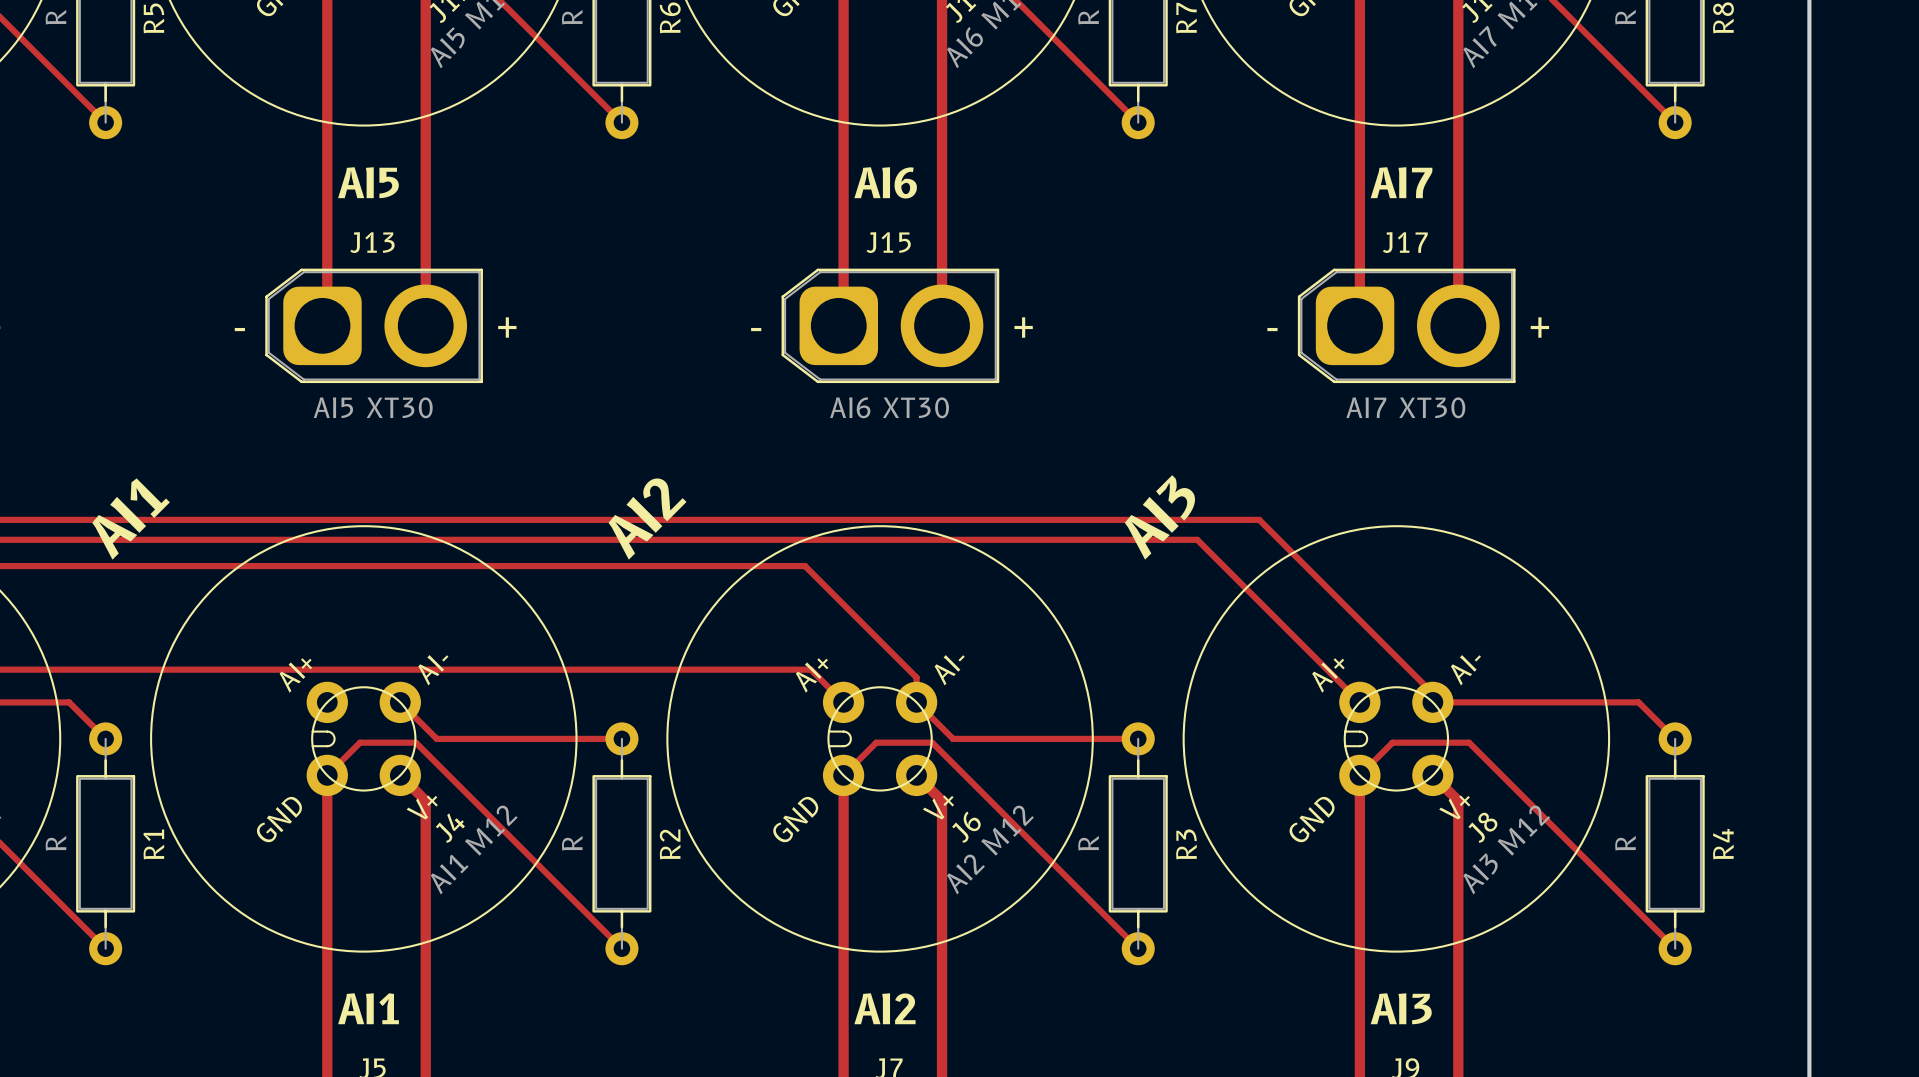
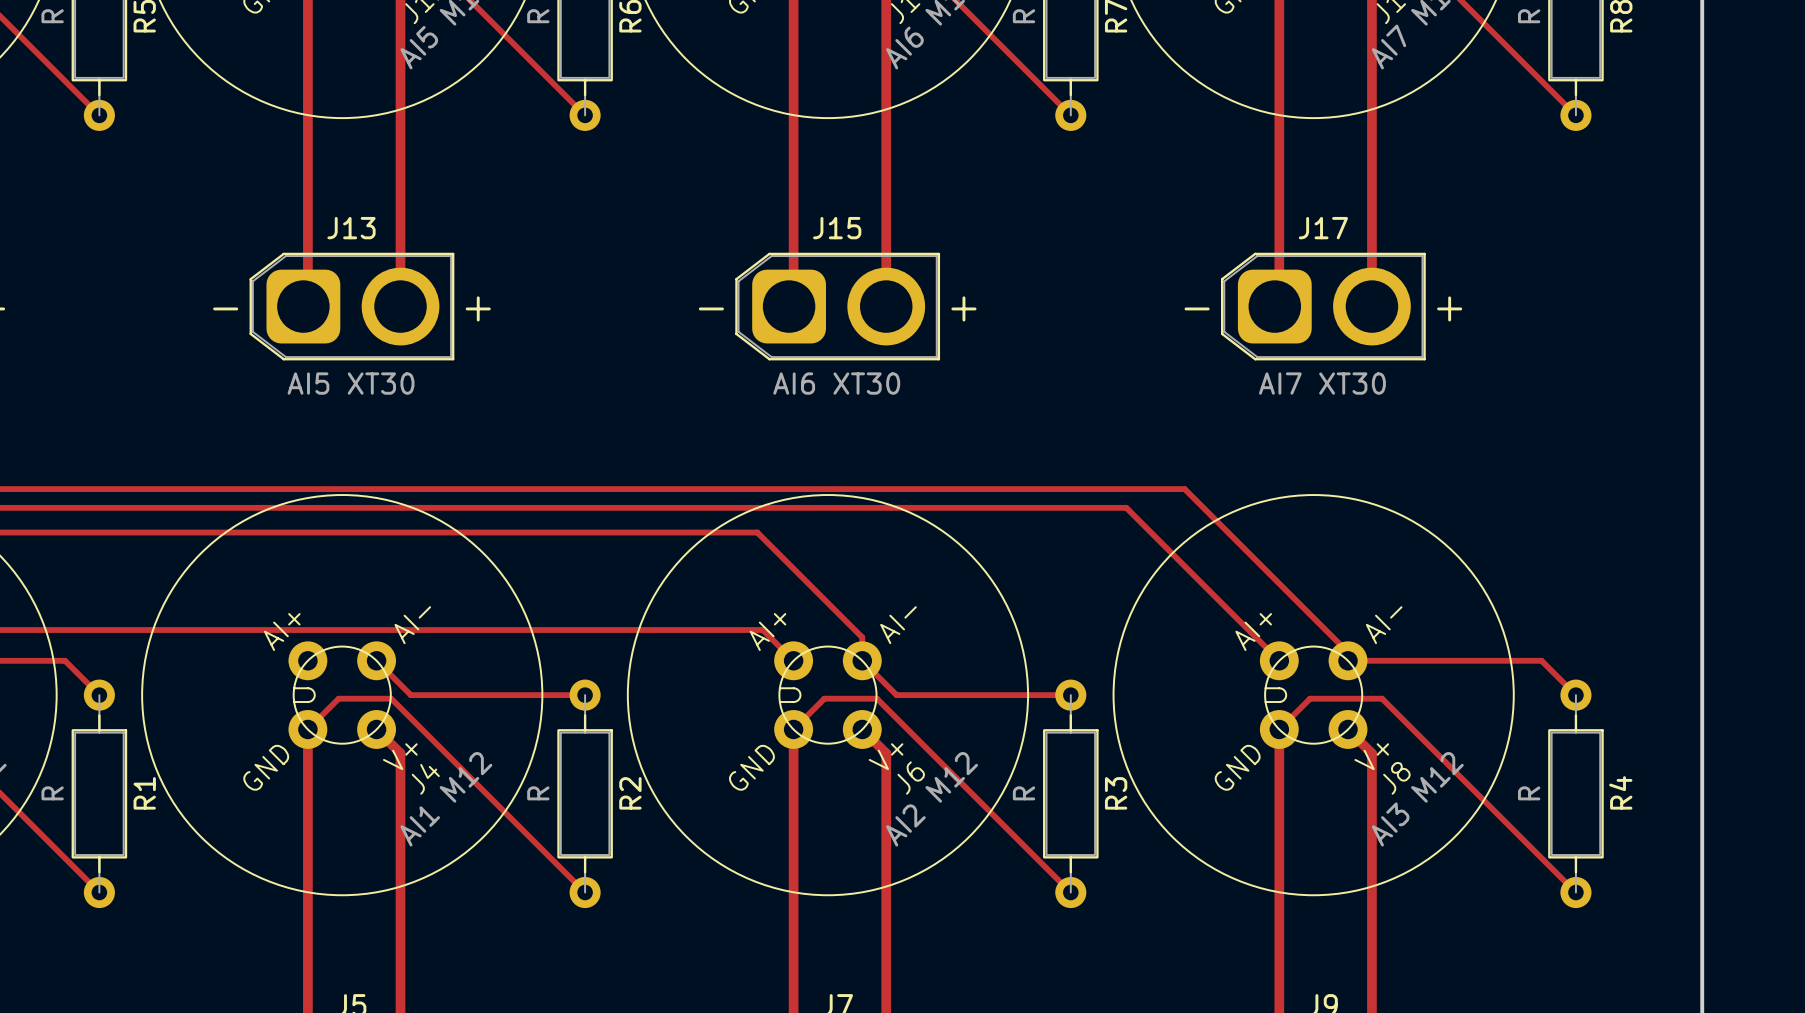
text: AI5 (368, 182) -> none
text: AI6 (885, 182) -> none
text: AI7 (1401, 182) -> none
text: AI3 (1159, 517) -> none
text: AI1 (131, 519) -> none
text: AI2 (647, 519) -> none
text: AI1 (368, 1008) -> none
text: AI2 (884, 1008) -> none
text: AI3 (1401, 1008) -> none

